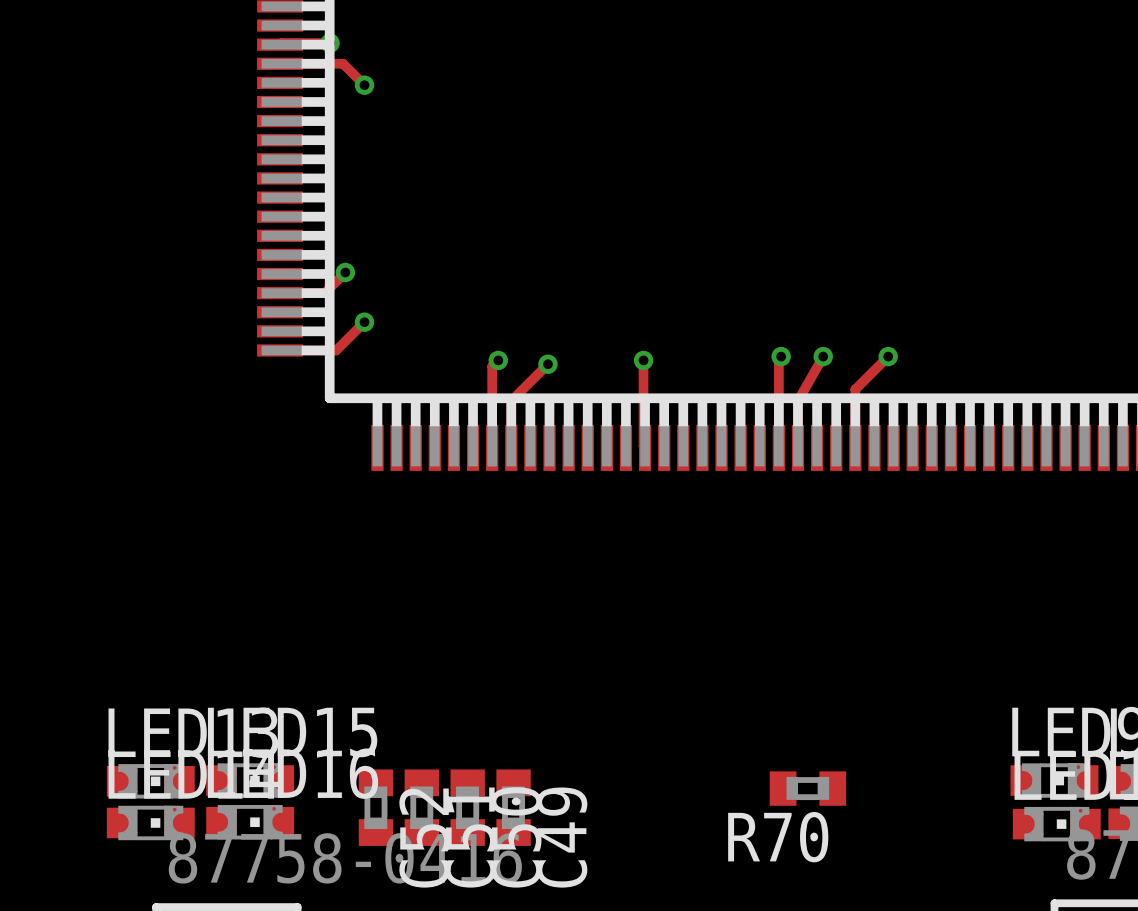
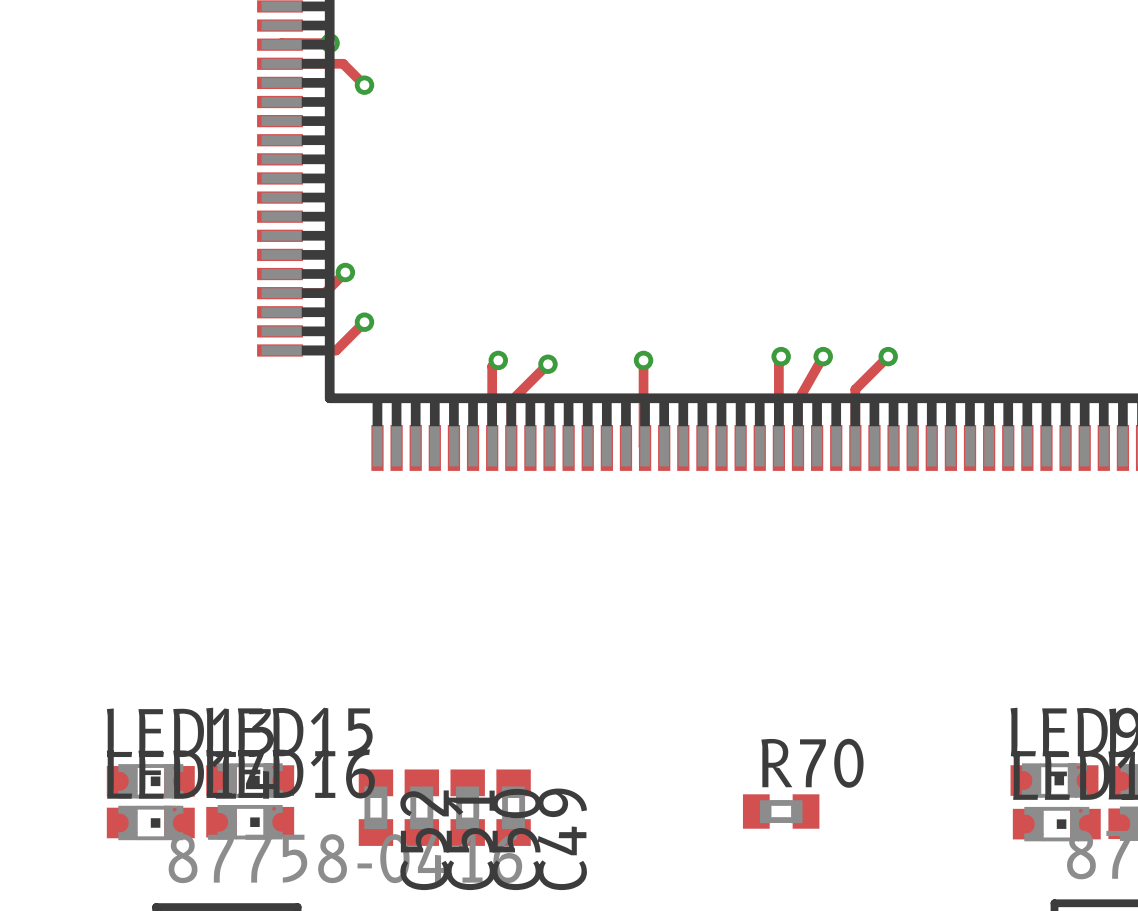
R70 position: (807, 788) -> (781, 811)
R70 name position: R70 (778, 837) -> R70 (812, 763)

